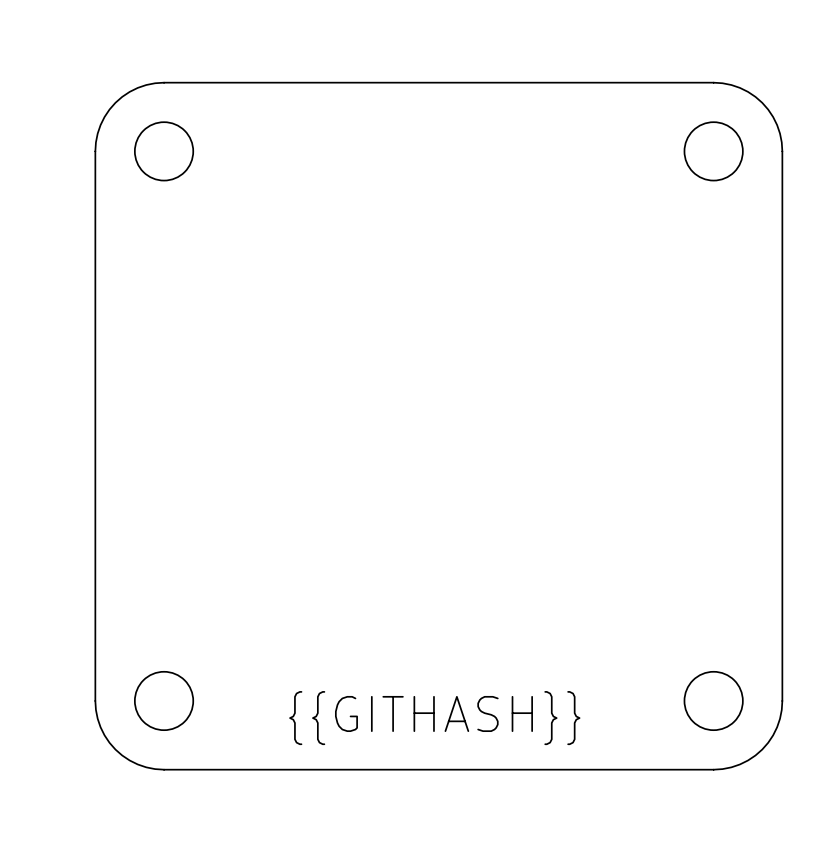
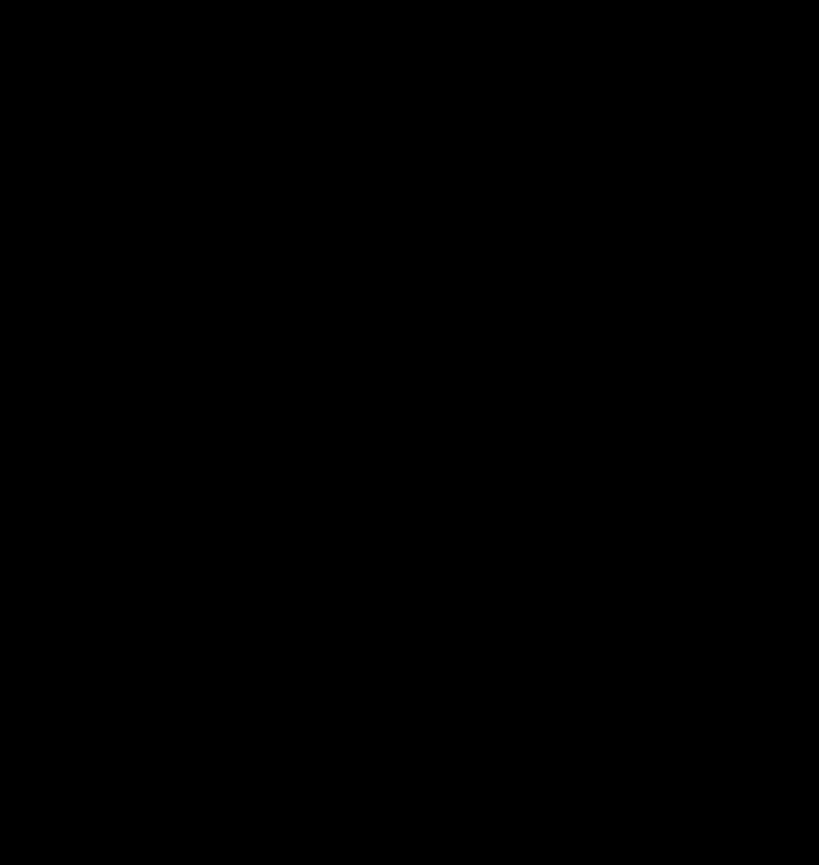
board edge: (164, 82) (713, 82) (739, 87) (762, 102) (777, 125) (782, 151) (782, 700) (777, 727) (762, 749) (739, 764) (713, 769) (164, 769) (137, 764) (115, 749) (100, 727) (95, 700) (95, 142) (104, 117) (122, 96) (146, 85) (164, 82) -> none
round board edge: [134, 121, 195, 182] -> none
round board edge: [683, 121, 744, 182] -> none
round board edge: [134, 670, 195, 732] -> none
round board edge: [683, 670, 744, 732] -> none
text: {{GITHASH}} (434, 718) -> none

